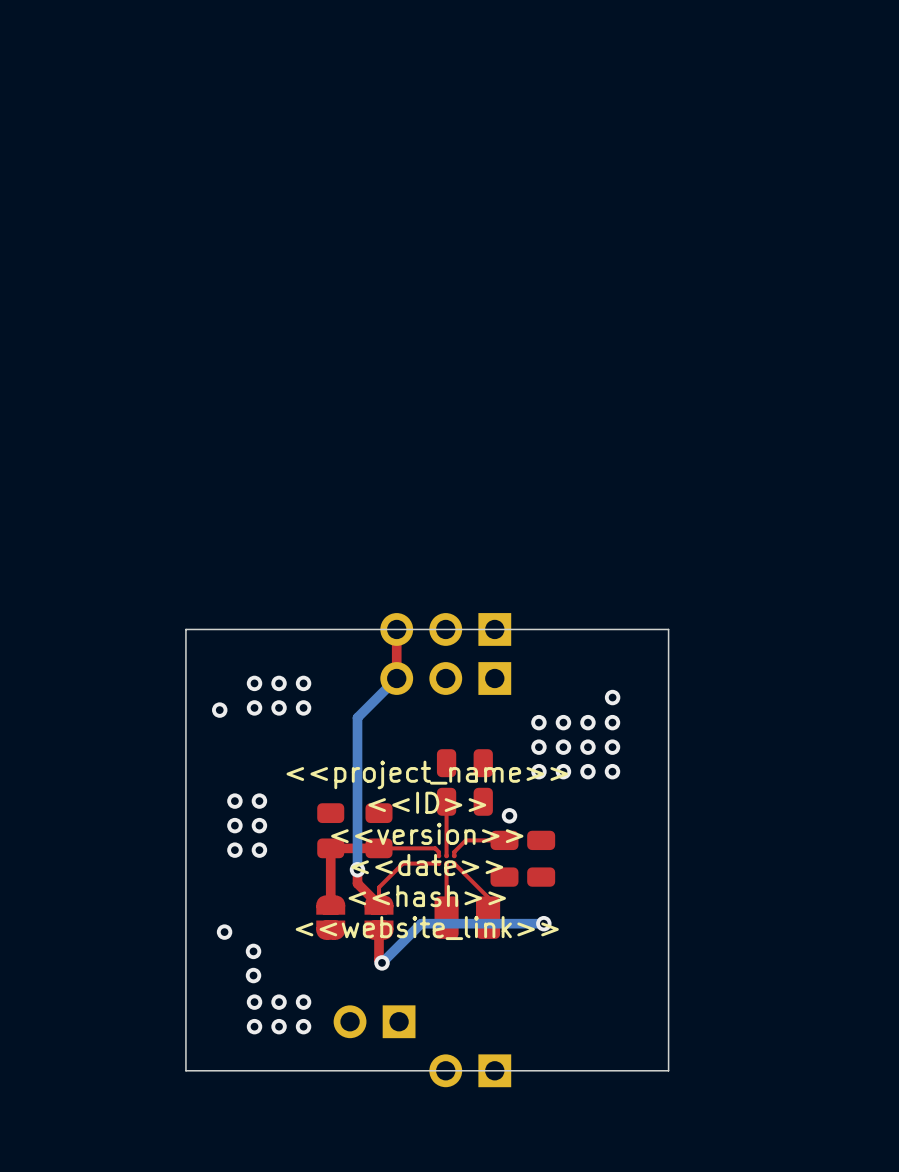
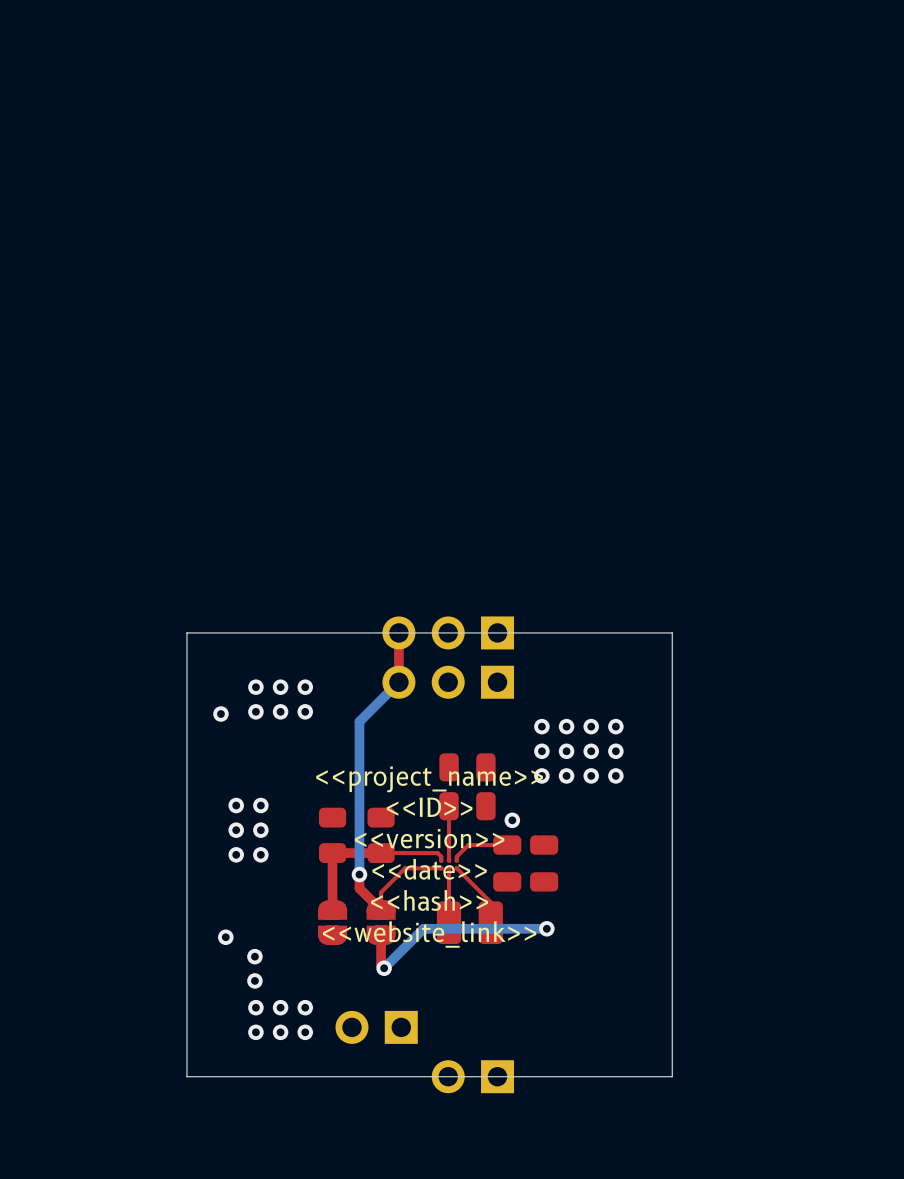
via: (612, 697) -> none

